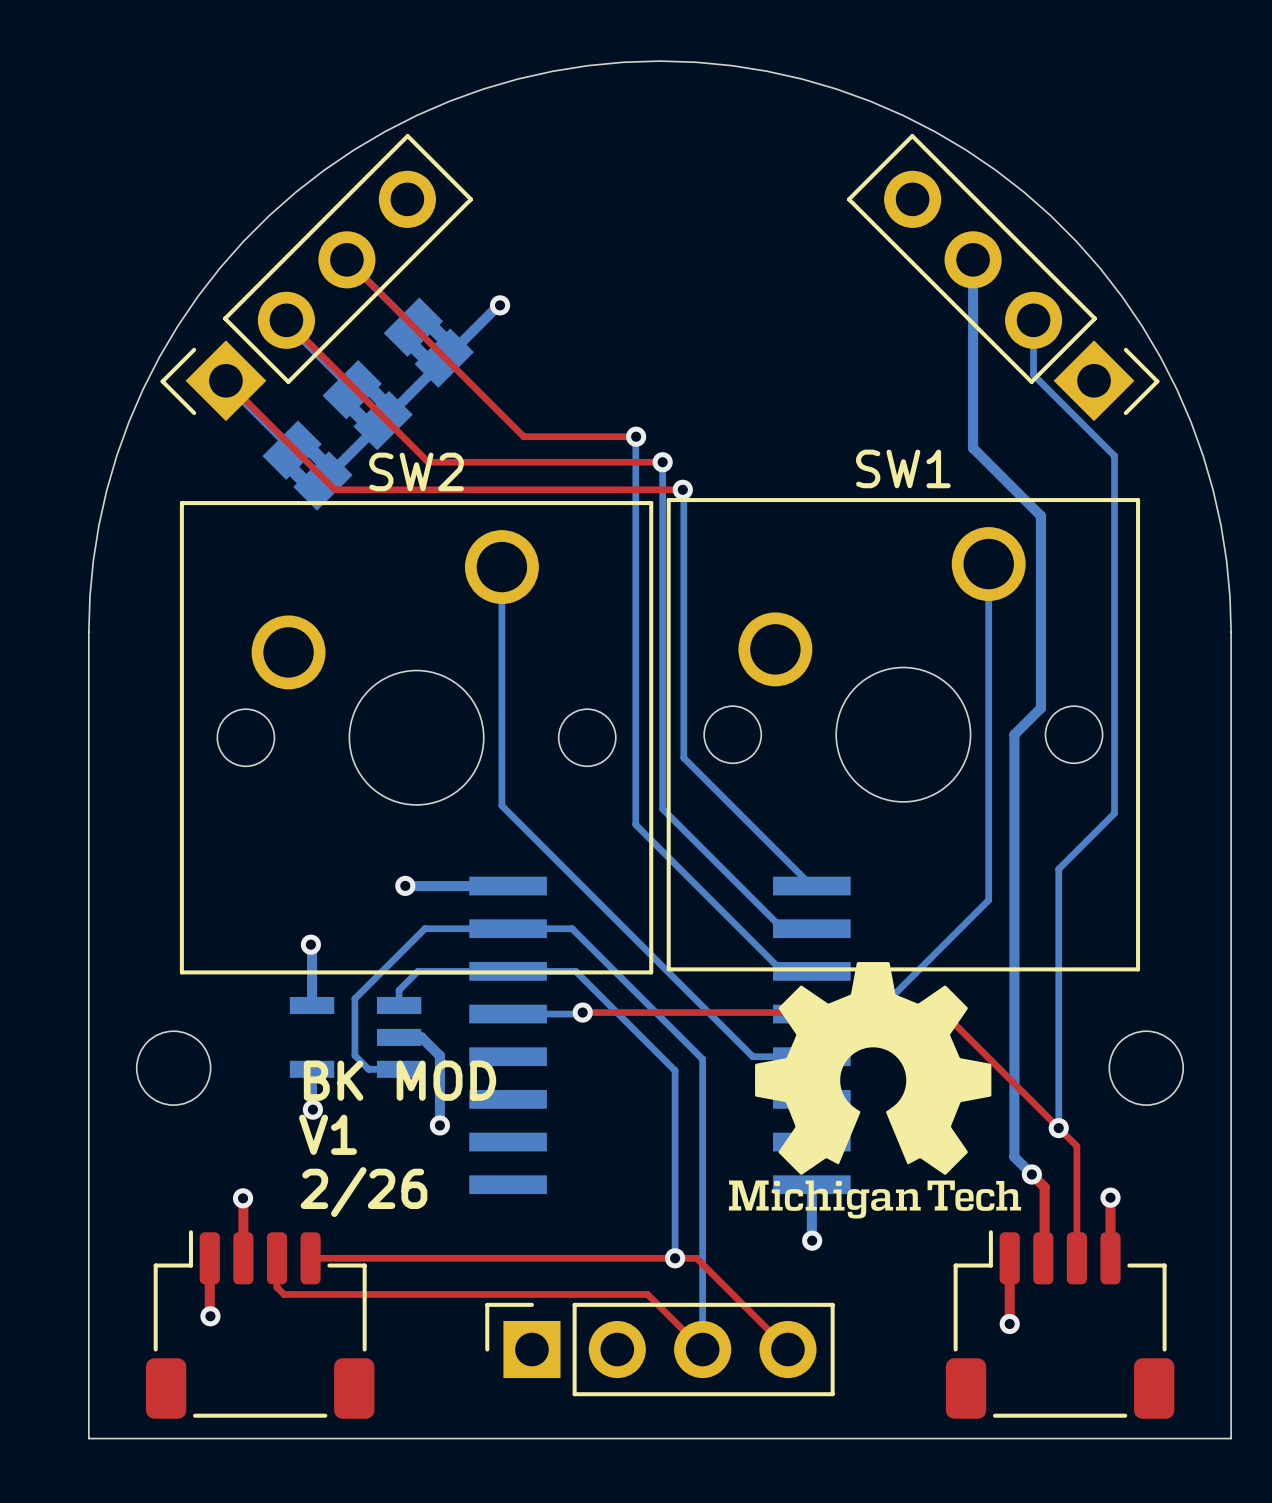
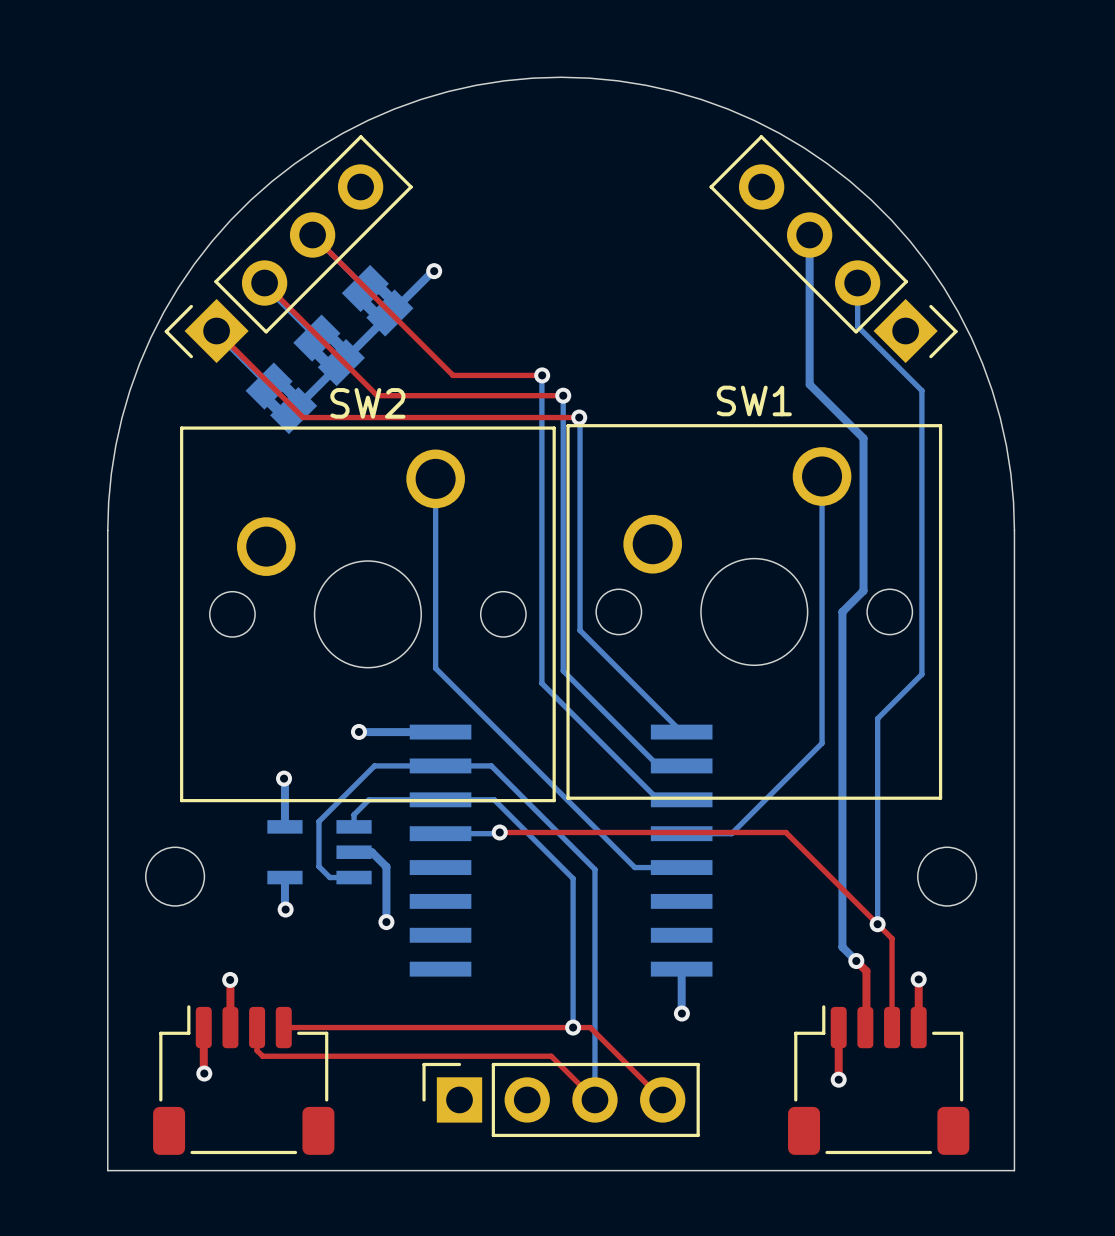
drawing: [728, 962, 1022, 1219] -> none
text: BK MOD (399, 1080) -> none
text: V1 (328, 1134) -> none
text: 2/26 (363, 1192) -> none

